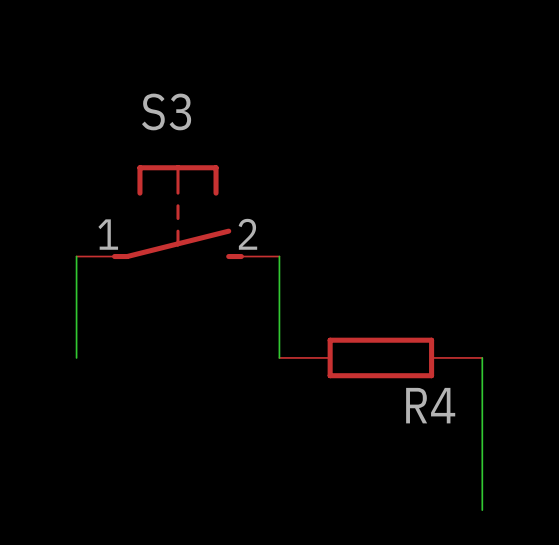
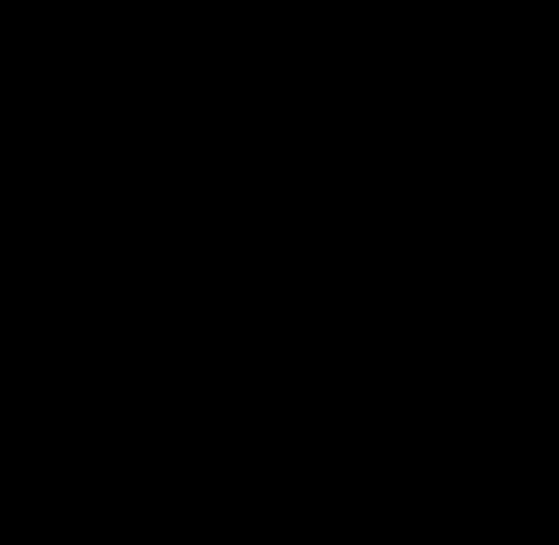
S3: (177, 212) -> none
wire: (76, 256) (76, 357) -> none
wire: (279, 256) (279, 357) -> none
R4: (380, 357) -> none
wire: (482, 357) (482, 510) -> none

